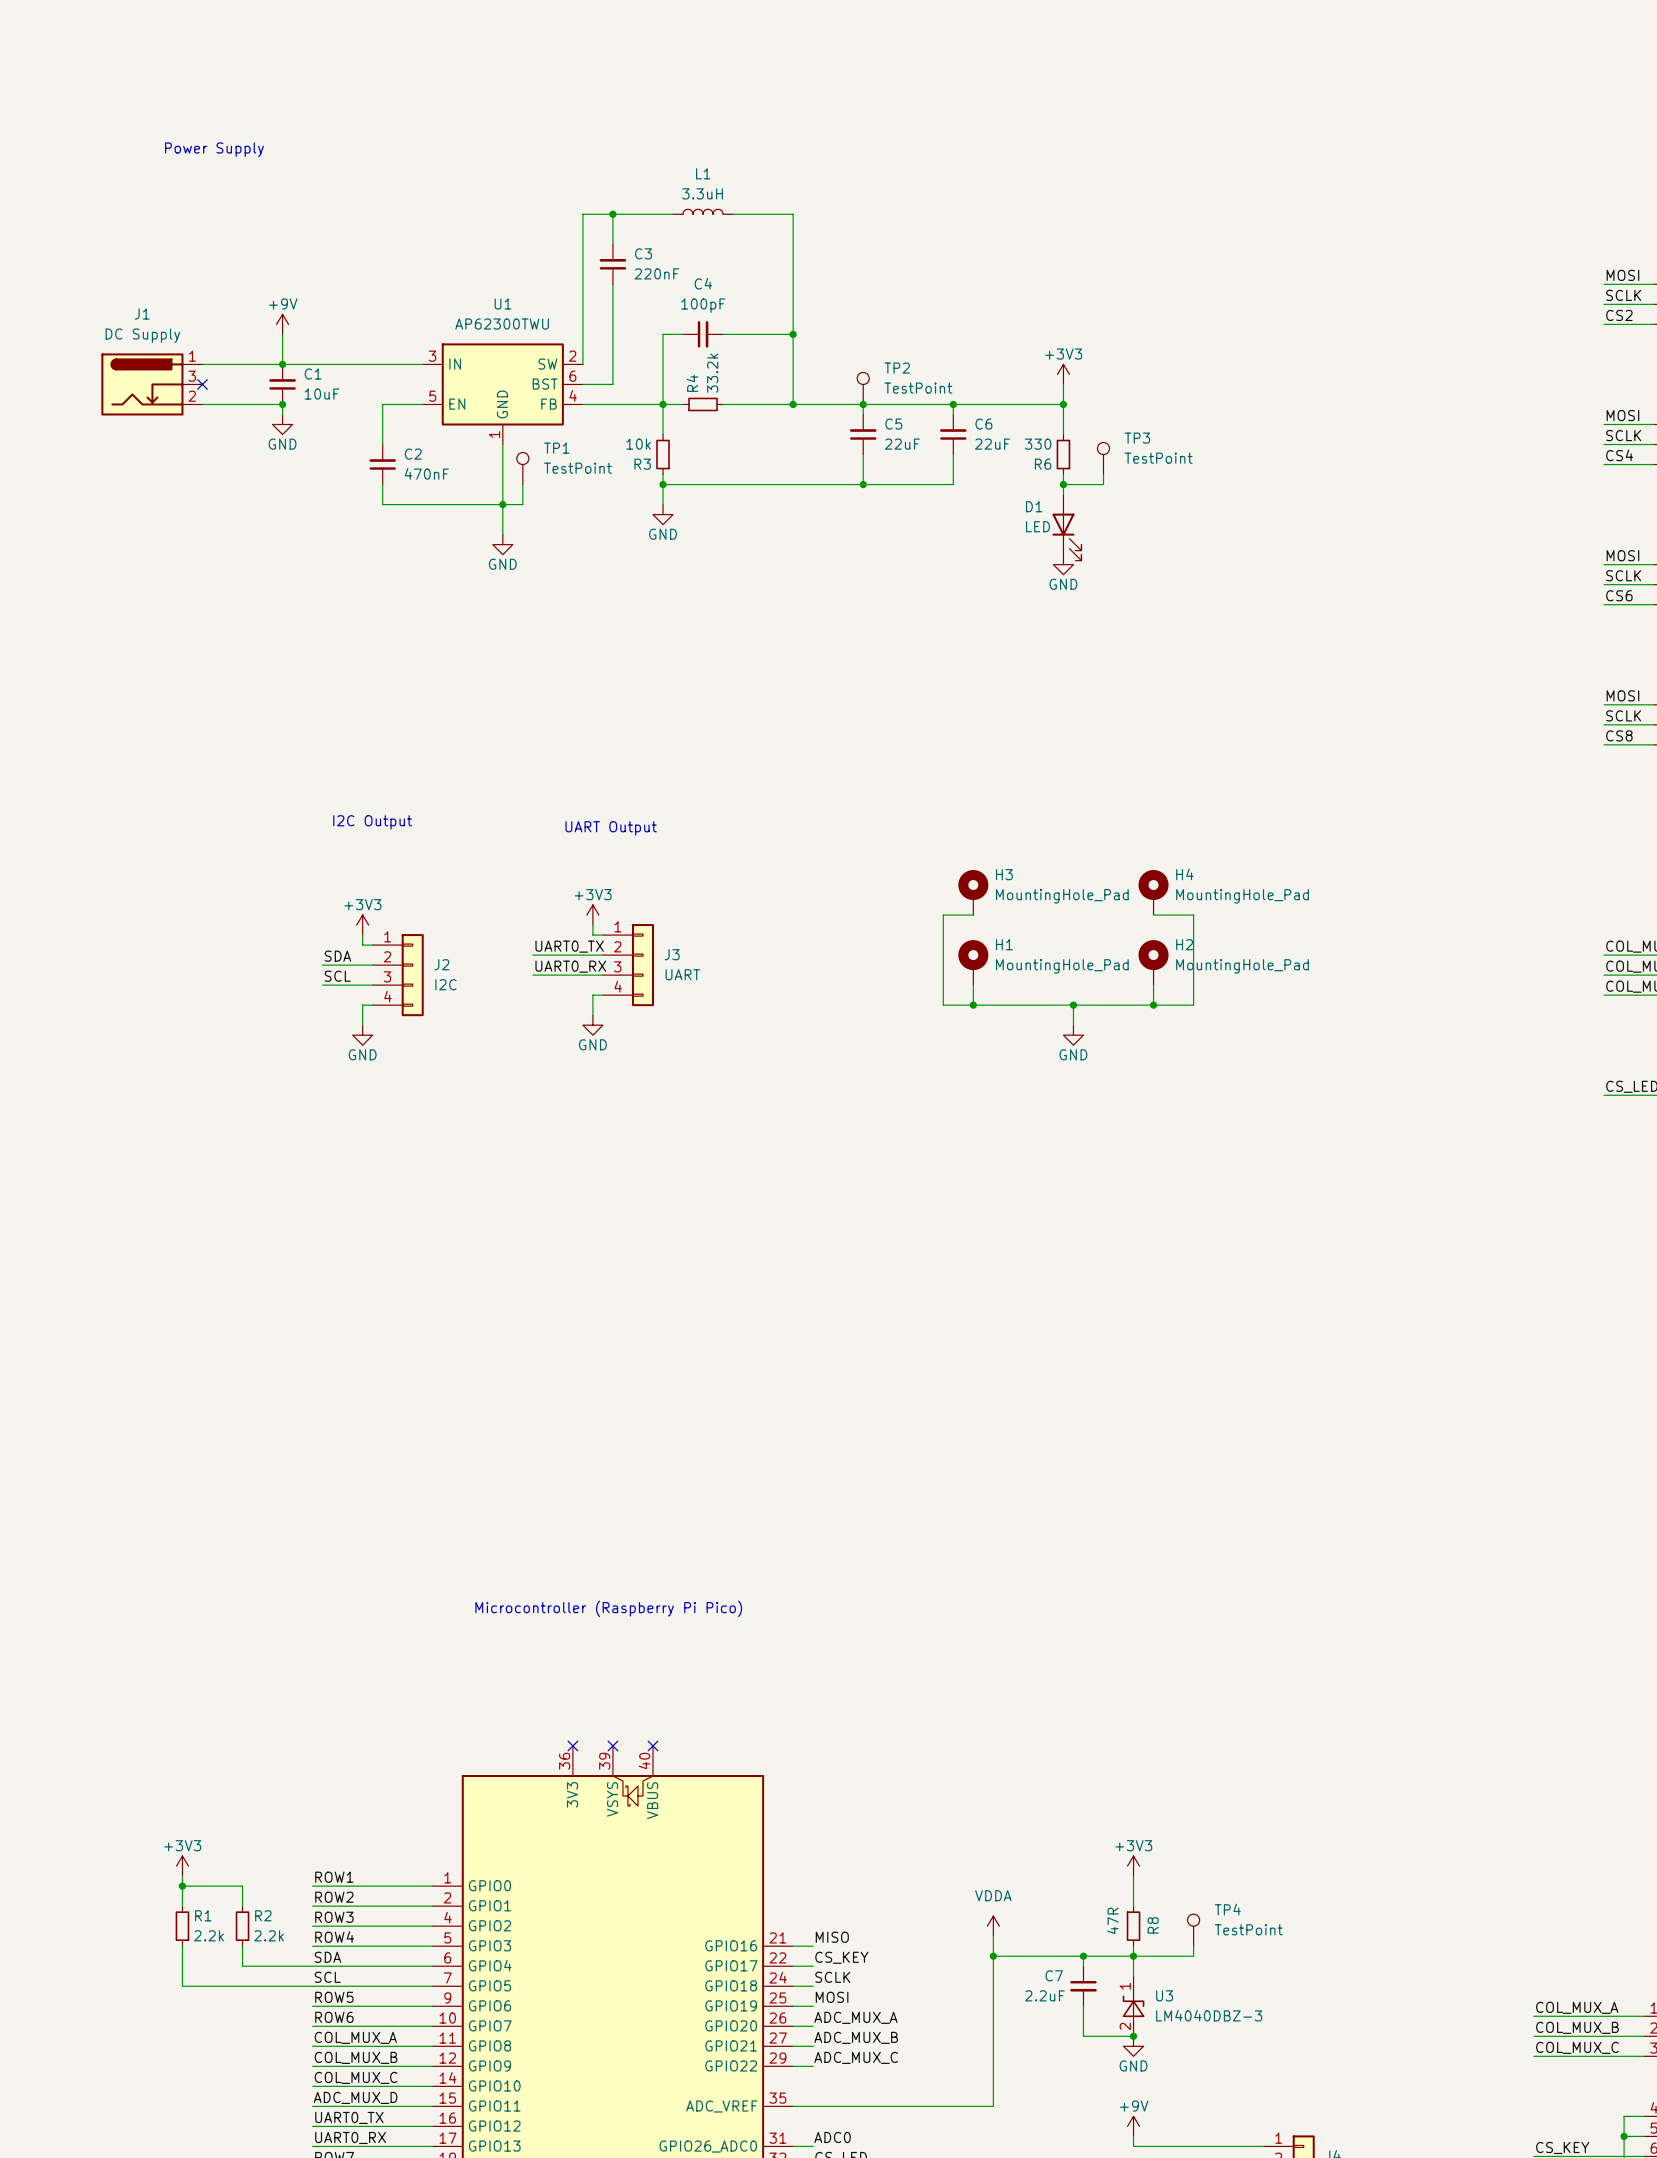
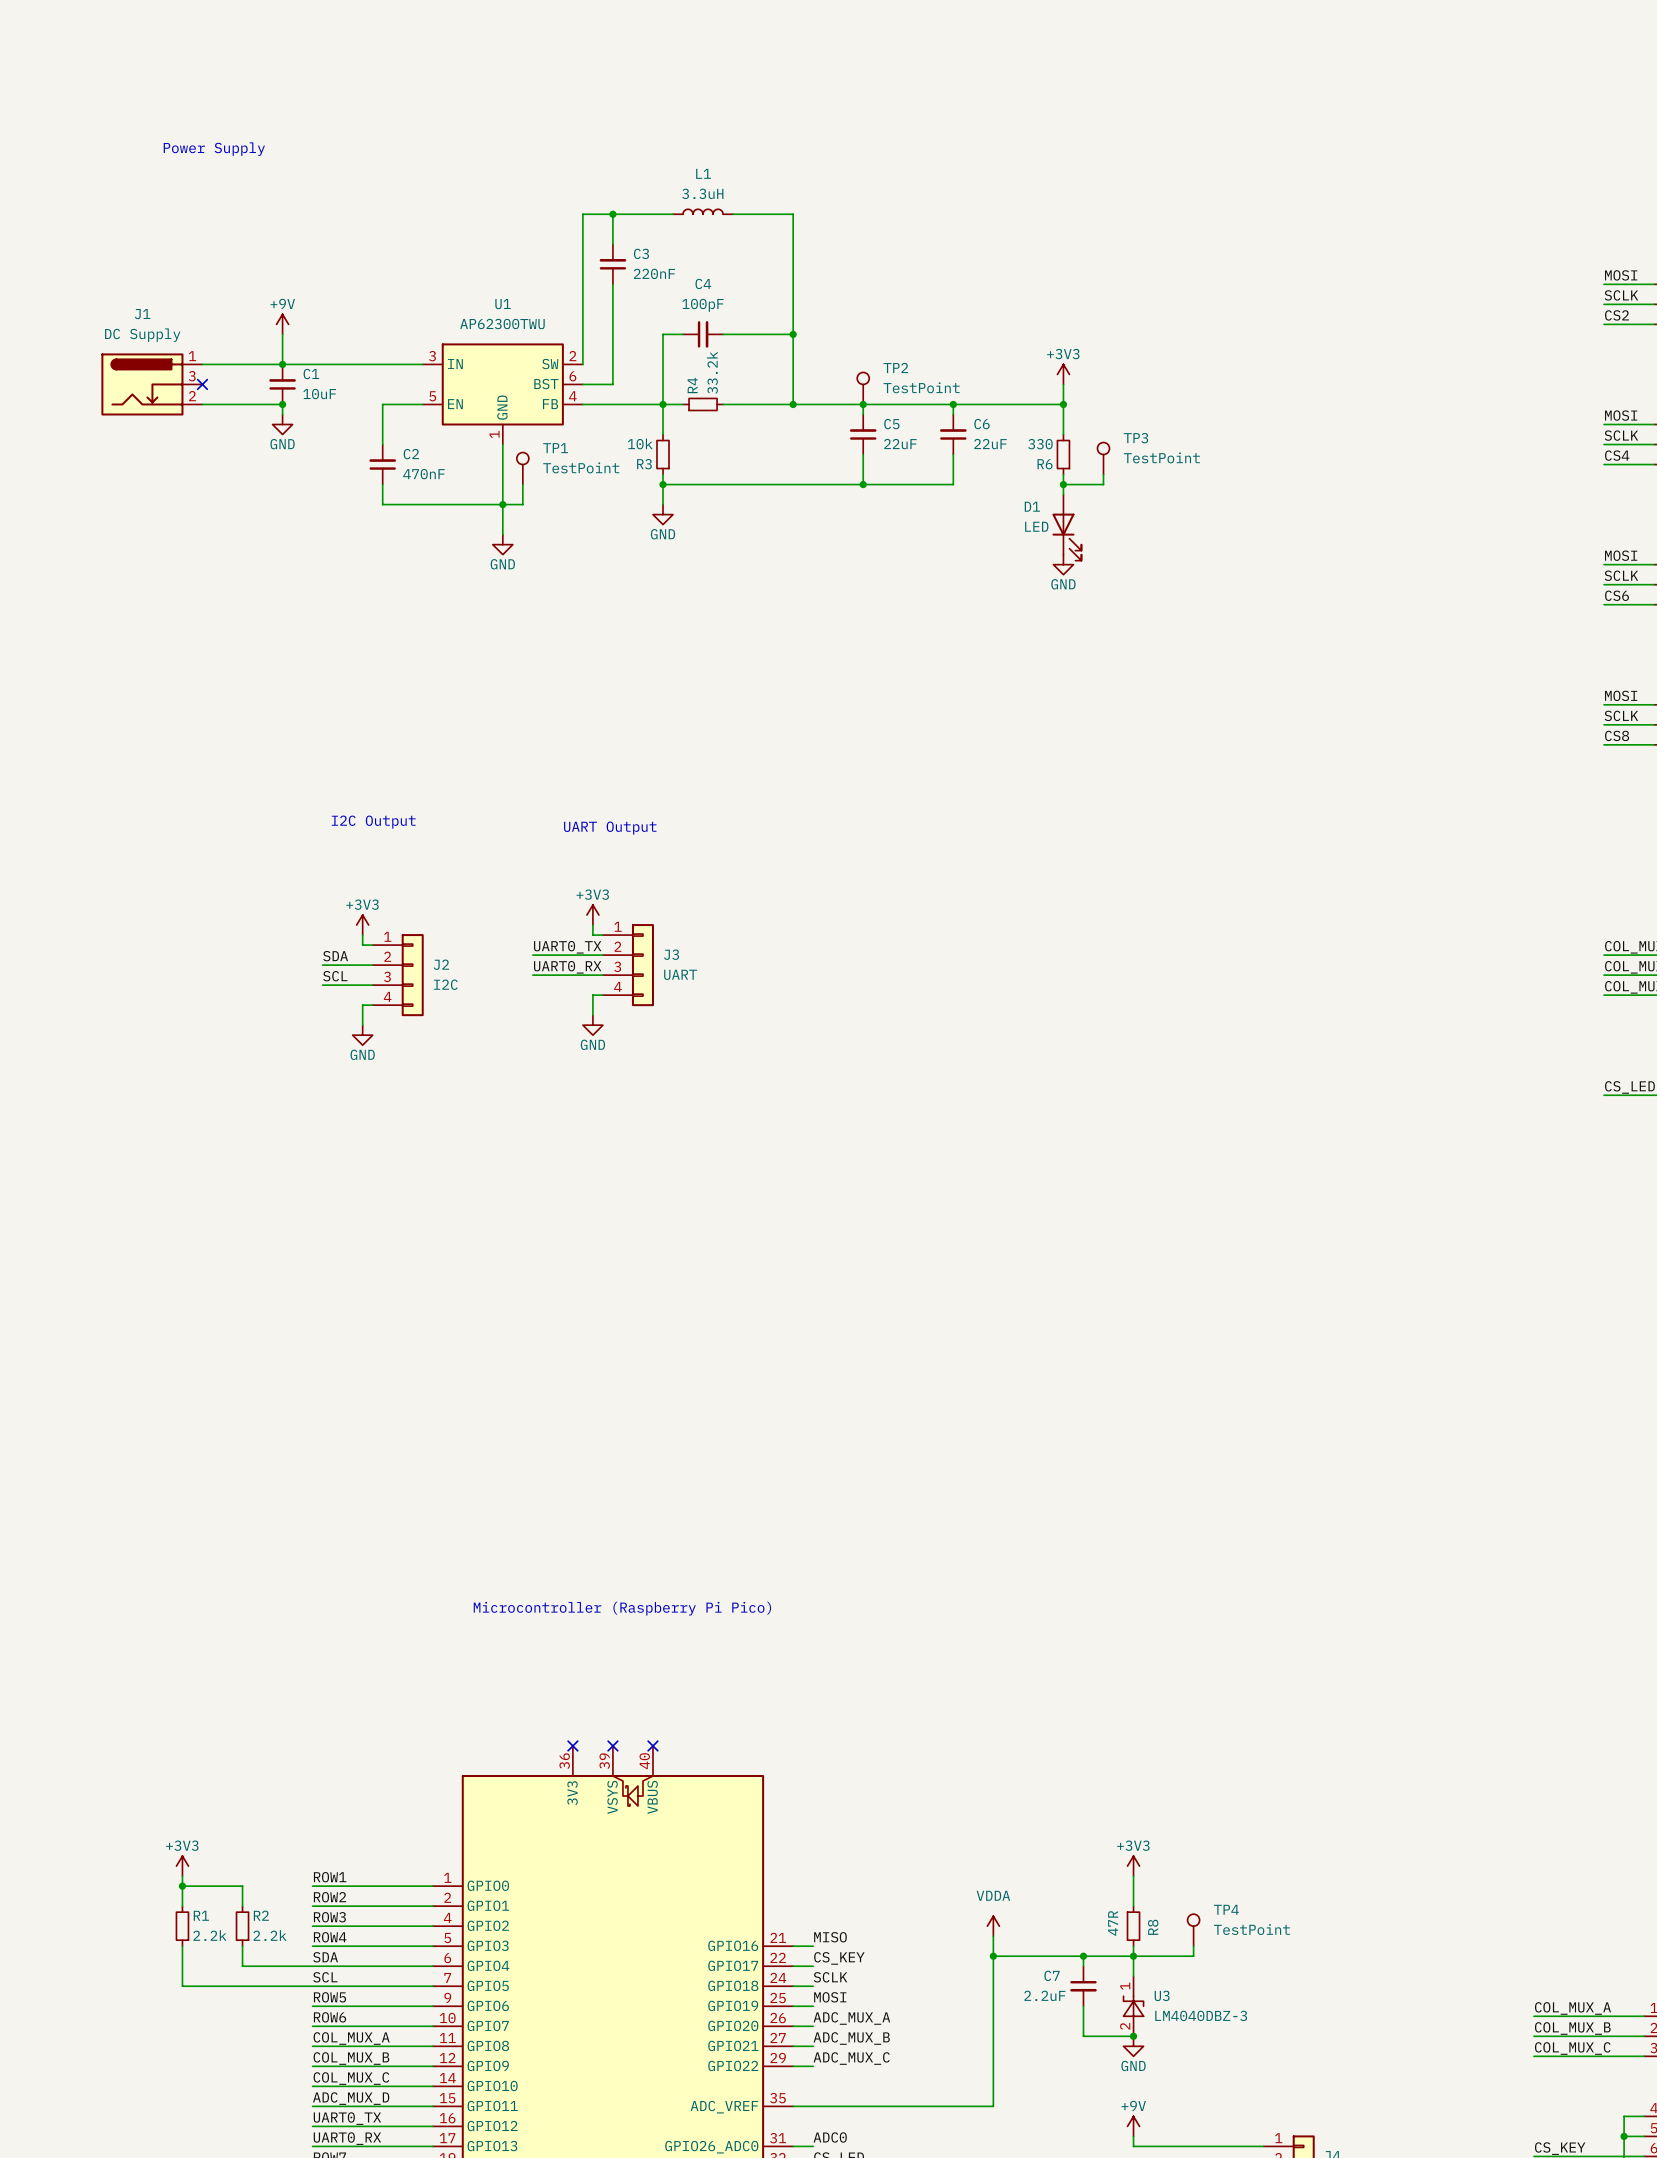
H3: MountingHole_Pad (973, 892) -> none
H4: MountingHole_Pad (1153, 892) -> none
wire: (973, 915) (943, 915) (943, 1005) (1193, 1005) (1193, 915) (1153, 915) -> none
H1: MountingHole_Pad (973, 962) -> none
H2: MountingHole_Pad (1153, 962) -> none
wire: (973, 985) (973, 1005) -> none
wire: (1153, 985) (1153, 1005) -> none
junction: (973, 1005) -> none
wire: (1073, 1005) (1073, 1025) -> none
junction: (1073, 1005) -> none
junction: (1153, 1005) -> none
power symbol: GND (1073, 1035) -> none

